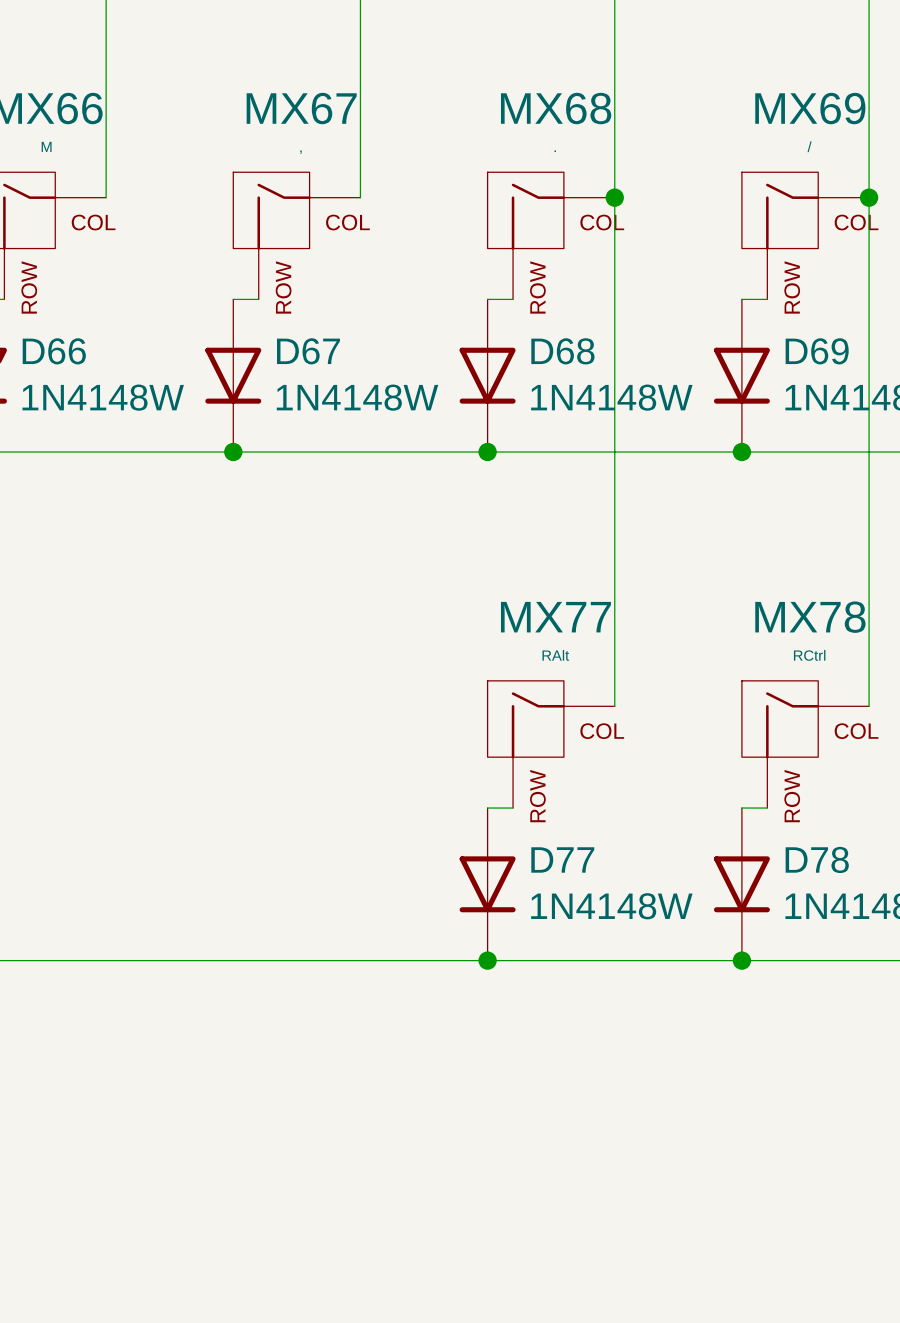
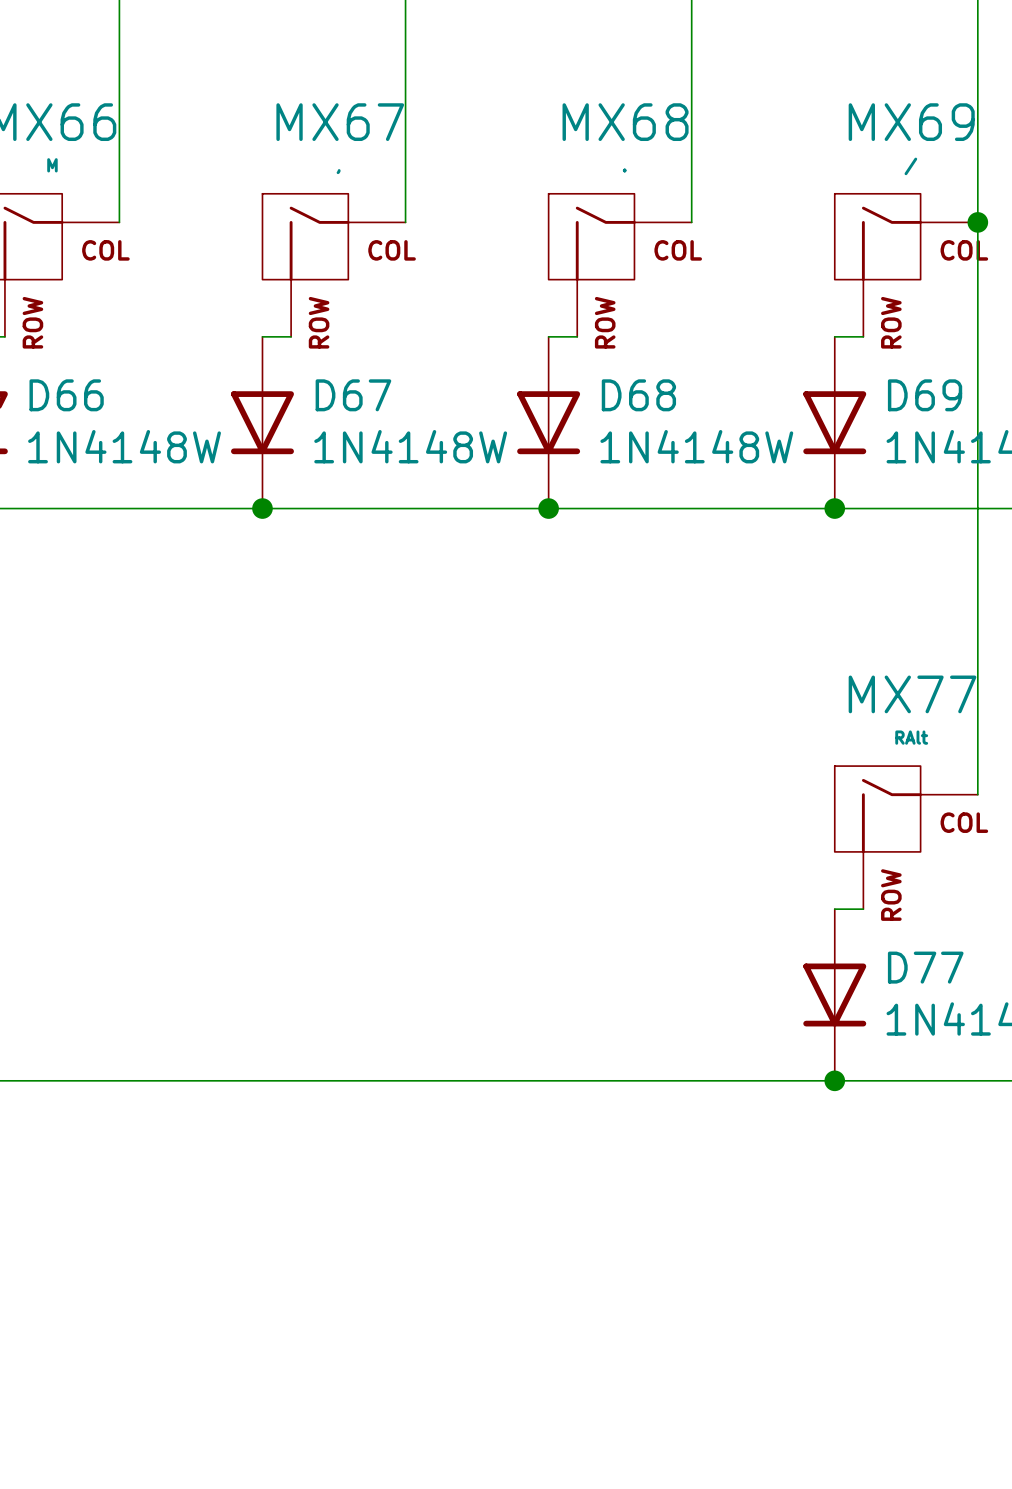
wire: (614, 197) (614, 706) -> none
junction: (614, 197) -> none
MX78 name: MX78 (810, 617) -> MX77 (912, 694)
MX78 value: RCtrl (809, 655) -> RAlt (911, 737)
MX77: RAlt (551, 744) -> none
wire: (487, 808) (513, 808) -> none
D78 name: D78 (817, 859) -> D77 (925, 967)
D77: 1N4148W (487, 884) -> none
junction: (487, 960) -> none

